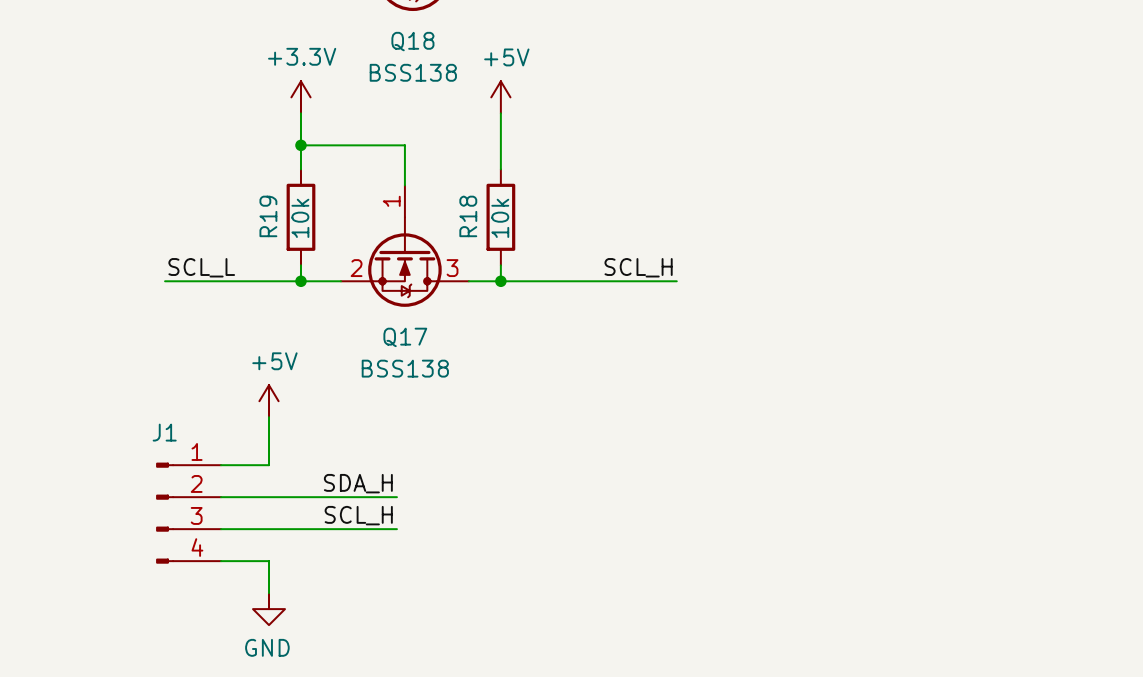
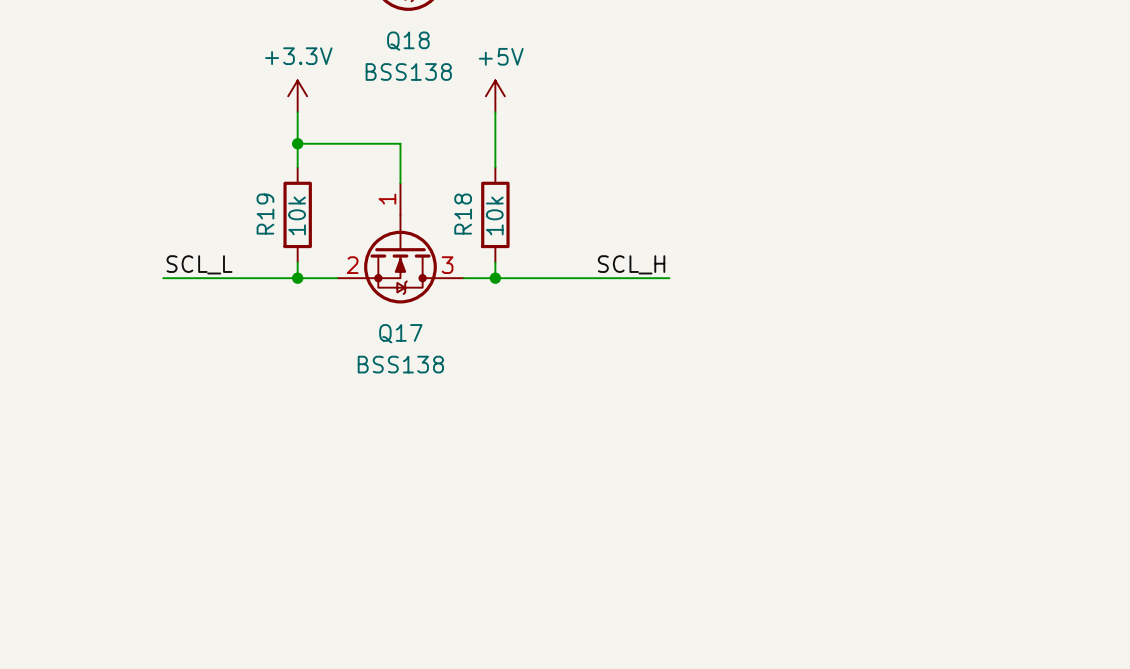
power symbol: +5V (269, 401) -> none
wire: (269, 417) (269, 465) (221, 465) -> none
label: SDA_H (358, 483) -> none
wire: (221, 497) (396, 497) -> none
J1: (188, 513) -> none
label: SCL_H (358, 515) -> none
wire: (221, 529) (396, 529) -> none
wire: (221, 561) (269, 561) (269, 593) -> none
power symbol: GND (269, 609) -> none

